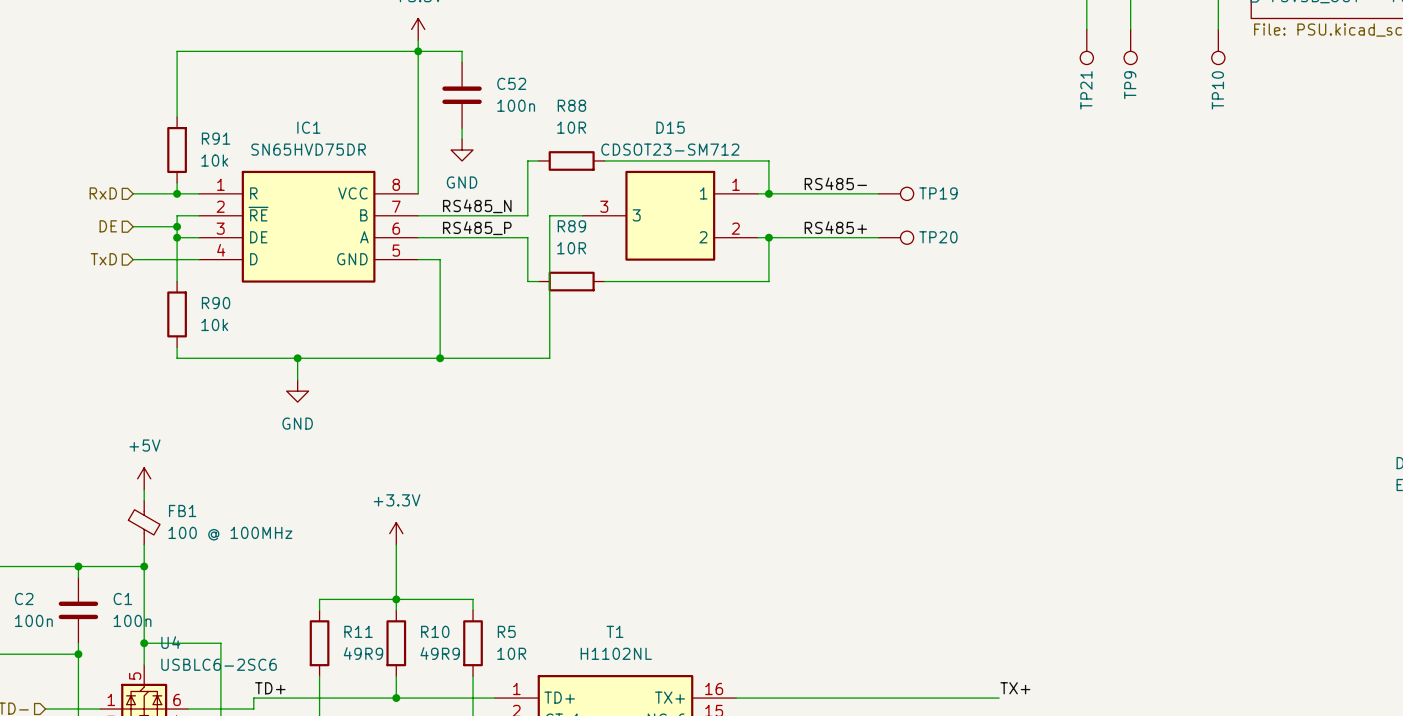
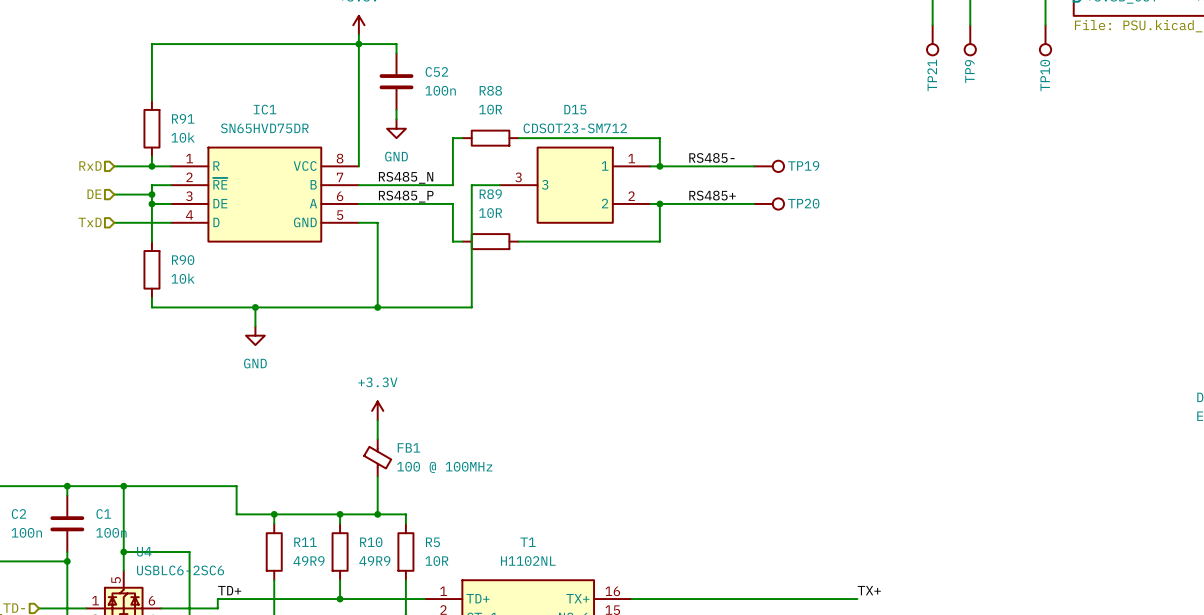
power symbol: +5V (144, 478) -> none
wire: (144, 489) (144, 500) -> none
wire: none -> (377, 420) (377, 439)
FB1 position: (144, 522) -> (377, 457)
power symbol position: +3.3V (396, 533) -> +3.3V (377, 410)
wire: (144, 544) (144, 566) -> (274, 514) (236, 514) (236, 486) (123, 486)
wire: (396, 544) (396, 599) -> none
wire: none -> (377, 476) (377, 514)
junction: none -> (274, 514)
junction: none -> (377, 514)

